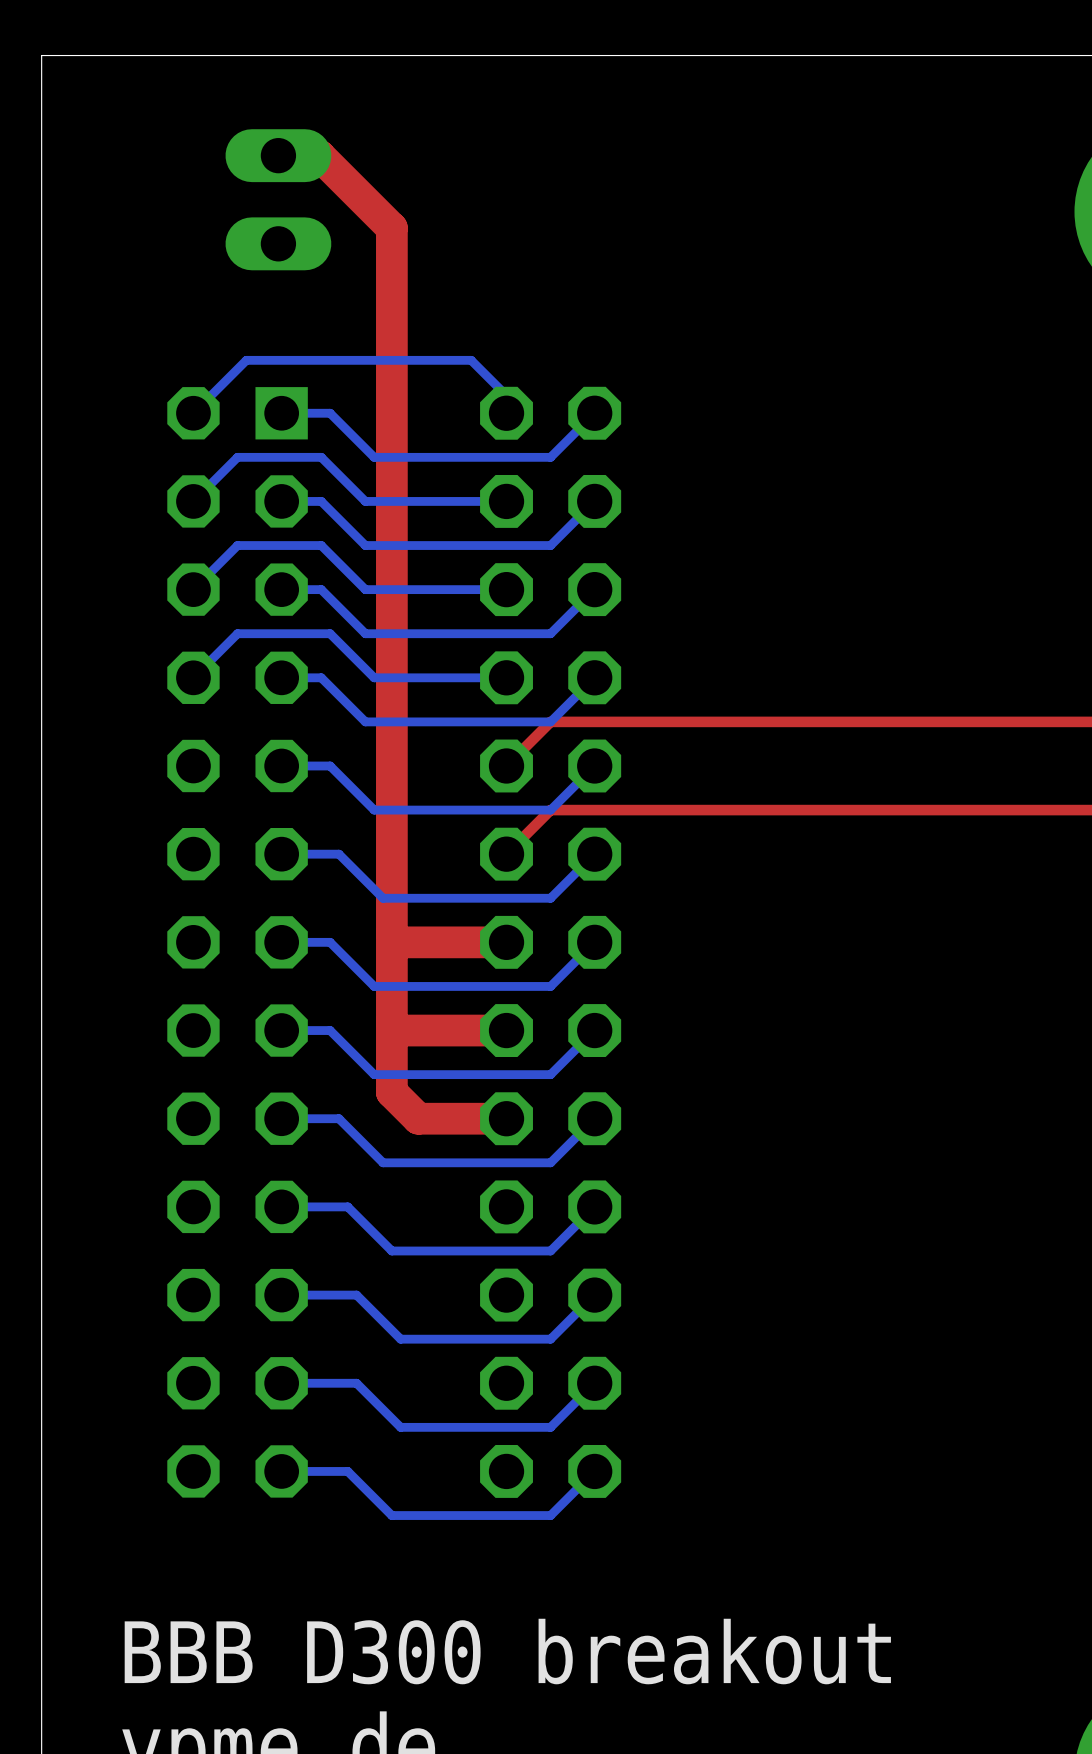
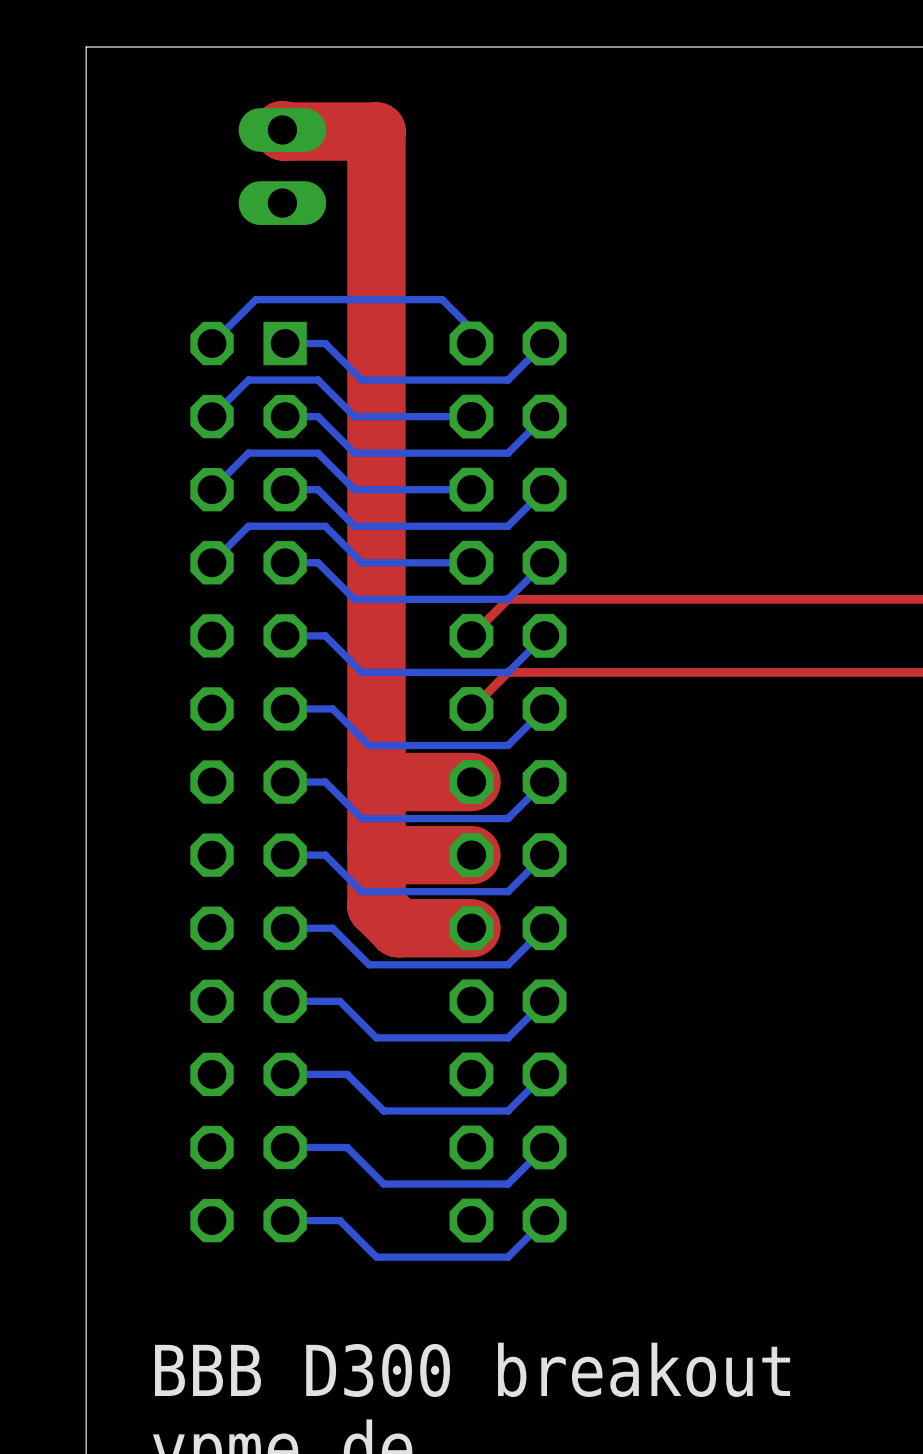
top track: (278, 155) (319, 155) (391, 228) -> (282, 129) (283, 131) (376, 131) (376, 190)
top track width: thin (391, 228) (391, 1092) (418, 1118) (506, 1118) -> thick (376, 190) (376, 906) (398, 928) (471, 928)
top track width: thin (506, 942) (400, 942) -> thick (471, 782) (383, 782)
top track width: thin (506, 1030) (400, 1030) -> thick (471, 855) (383, 855)

